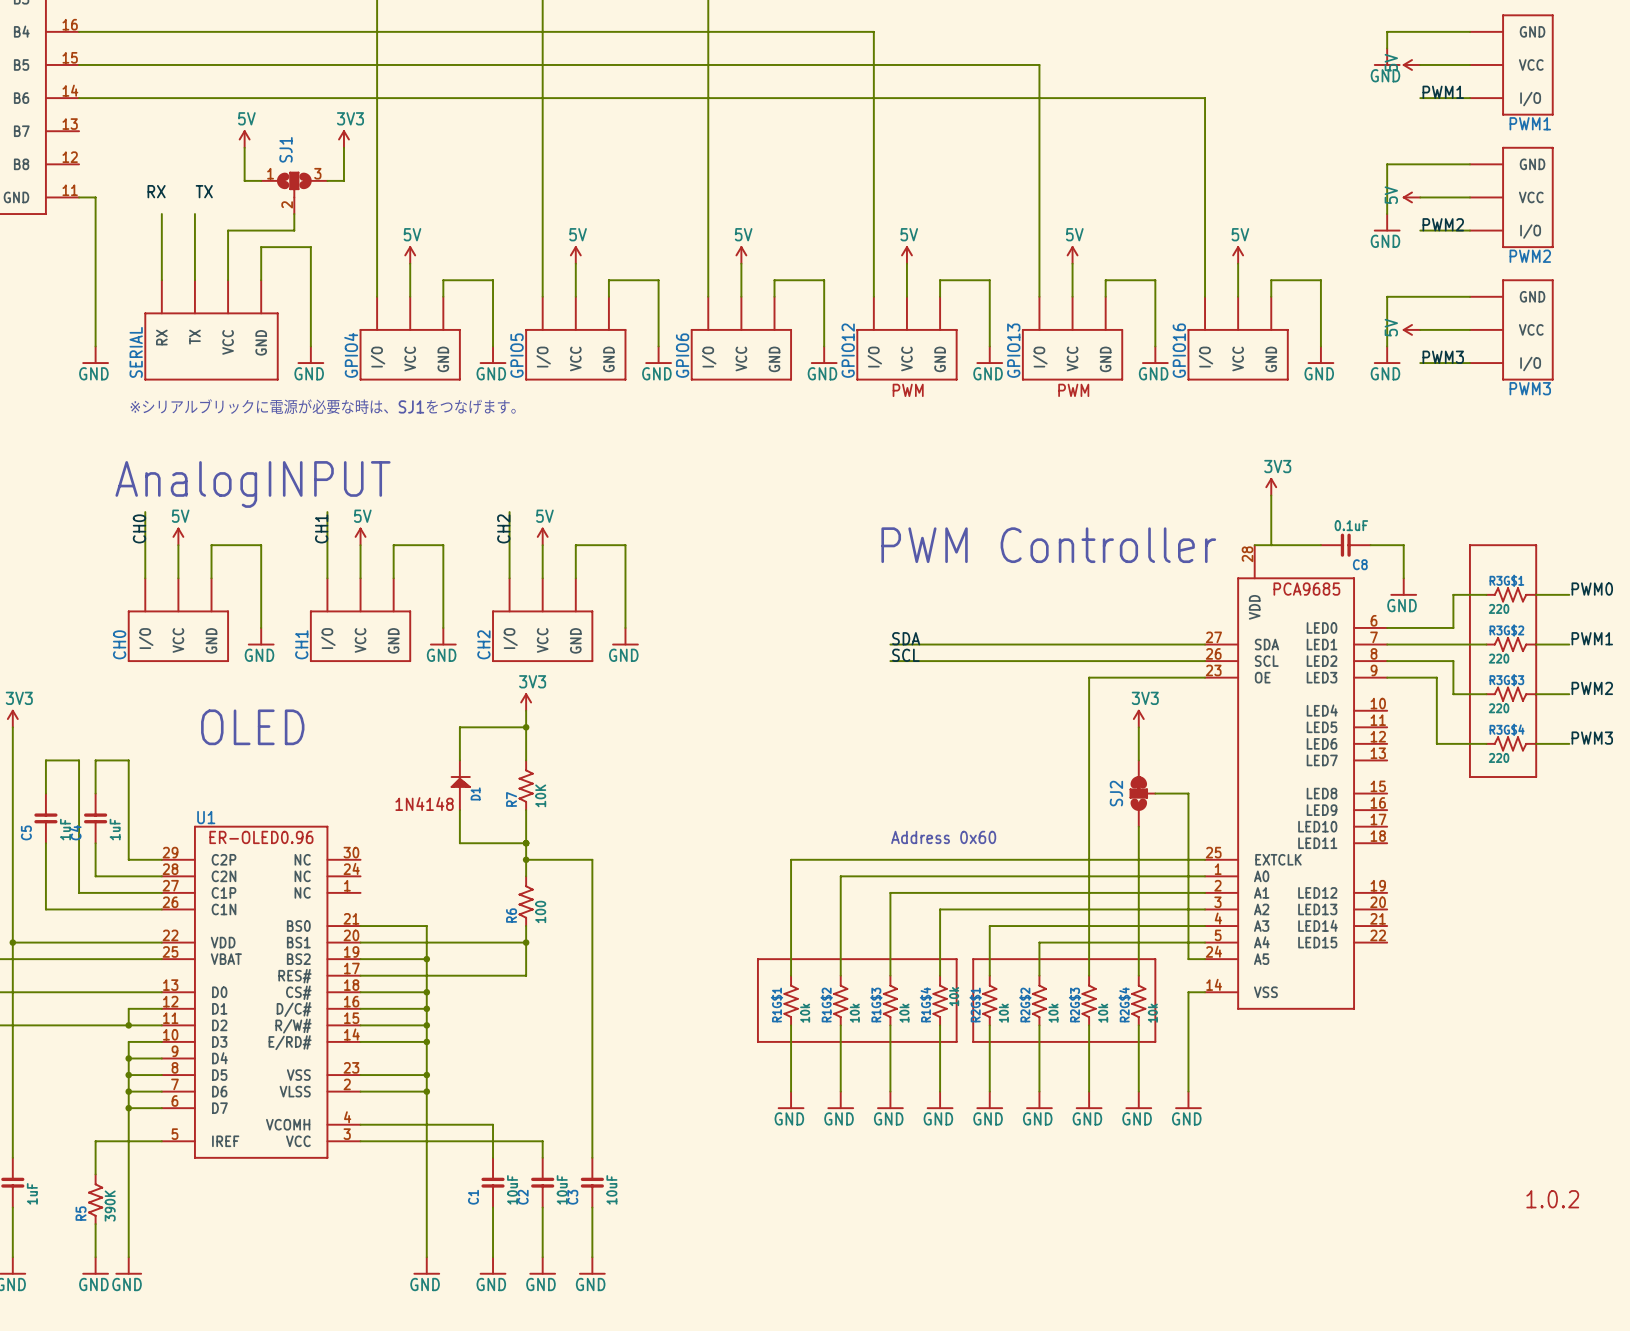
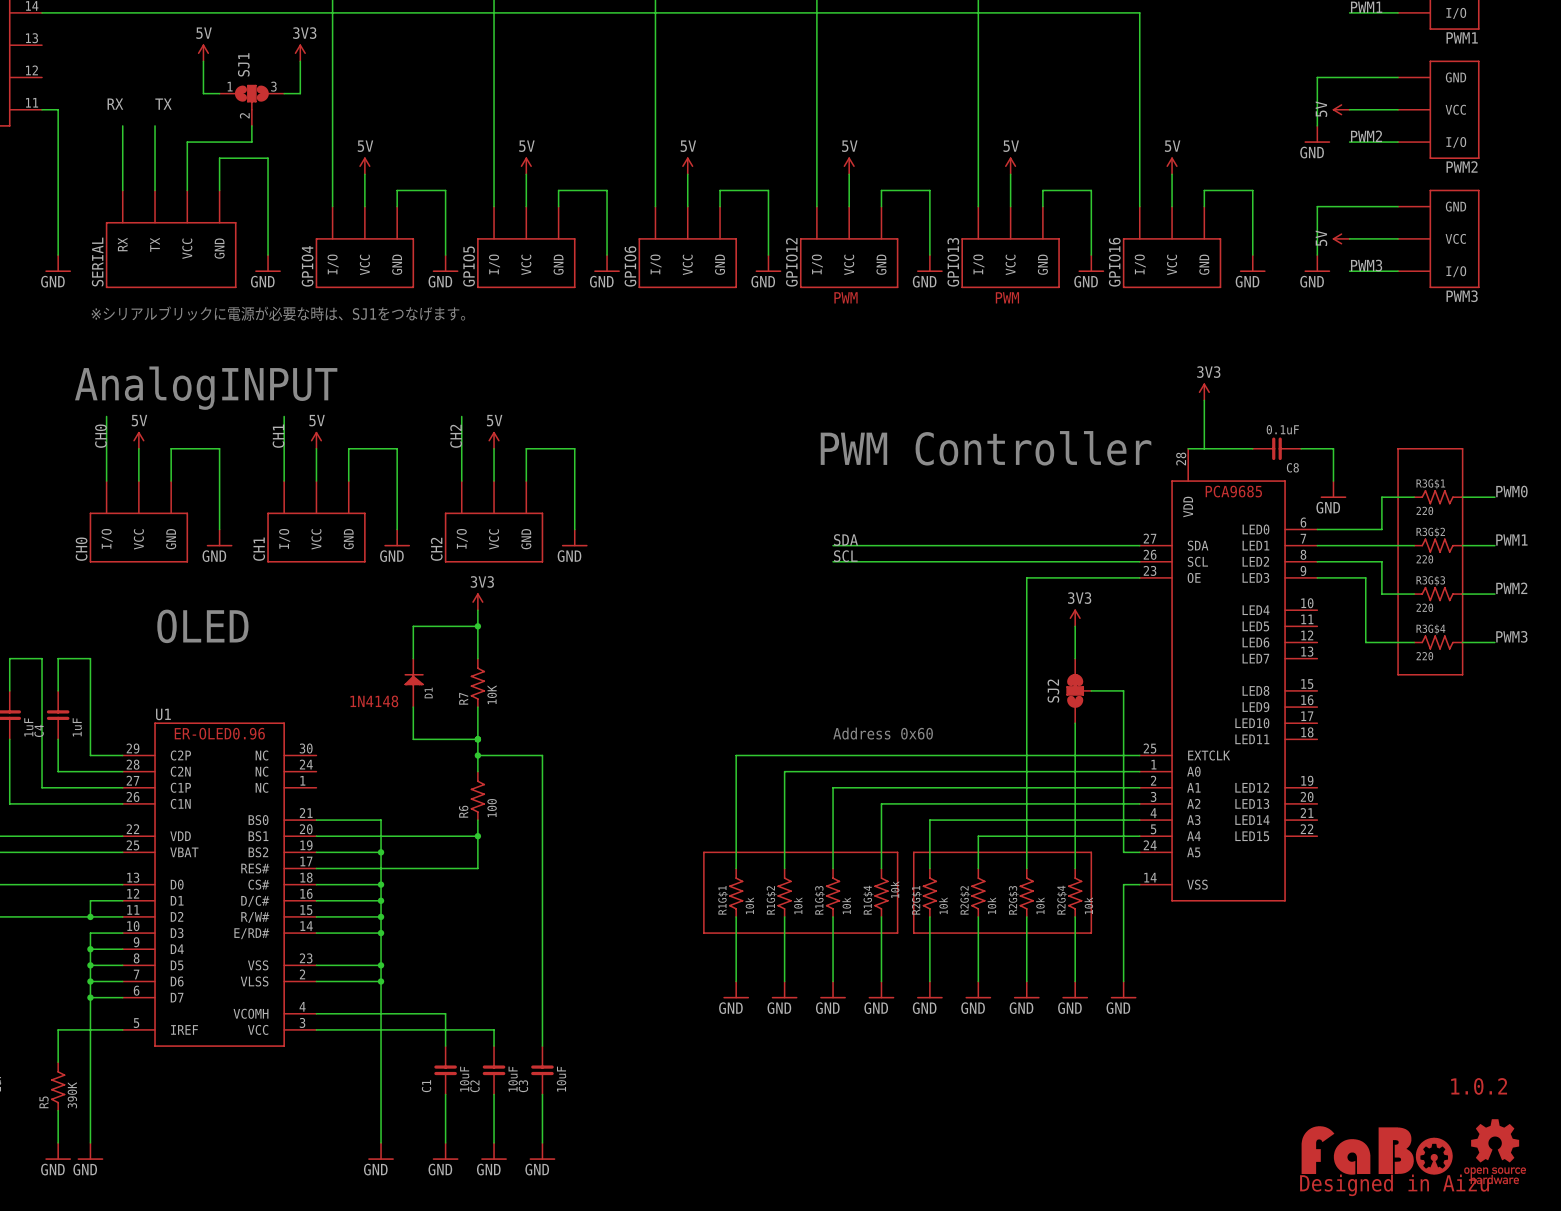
part: none -> (1377, 1150)
part: none -> (1495, 1151)

